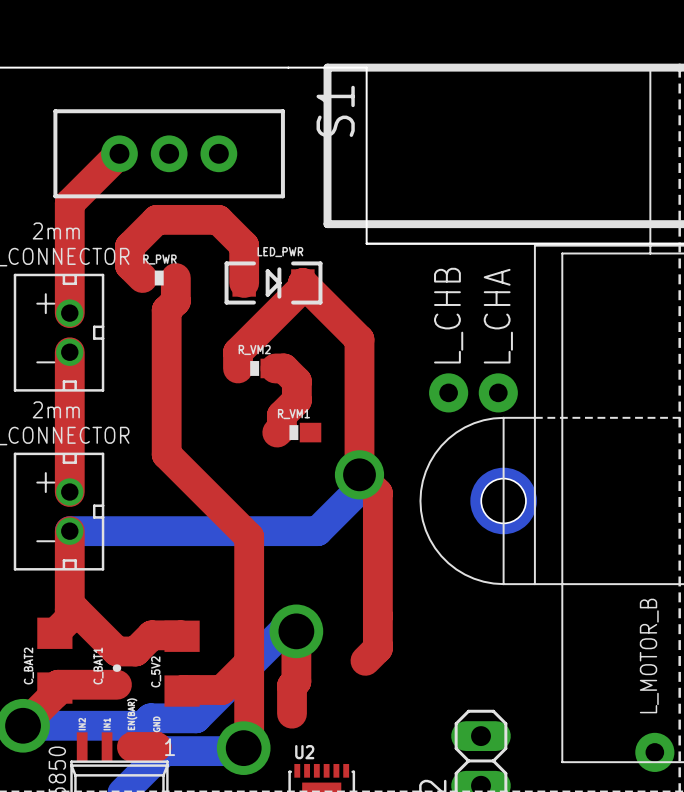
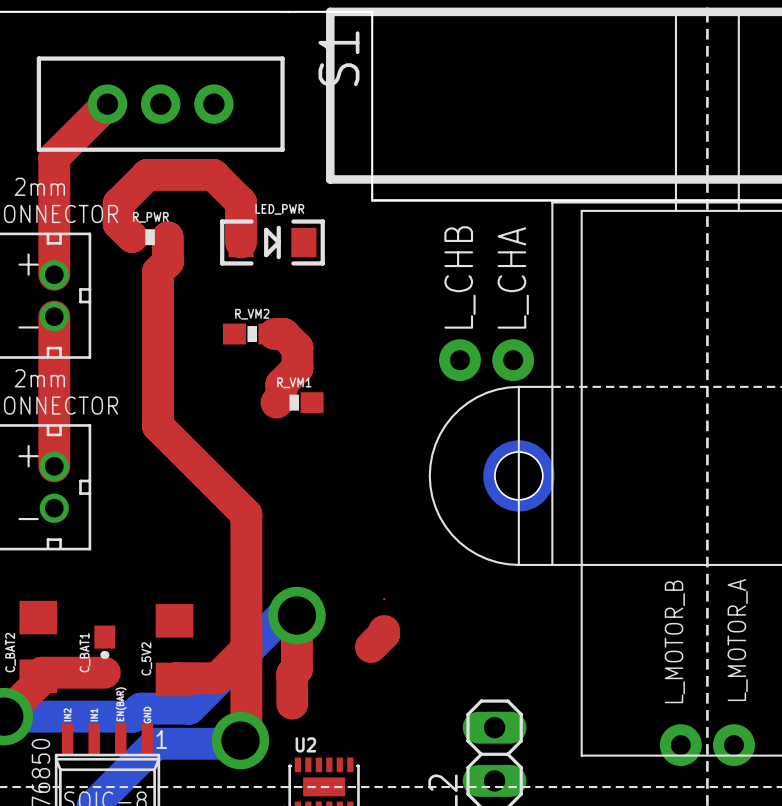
top track: (238, 368) (238, 352) (302, 287) (302, 282) (359, 339) (359, 474) (377, 493) (377, 645) -> none
bottom track: (359, 474) (359, 489) (317, 531) (69, 531) -> none
via: (359, 474) -> none
top track: (69, 531) (69, 618) (54, 633) -> none
top track: (69, 609) (74, 609) (116, 651) (135, 651) (151, 635) (182, 636) -> none
top track: (131, 746) (156, 746) -> none

